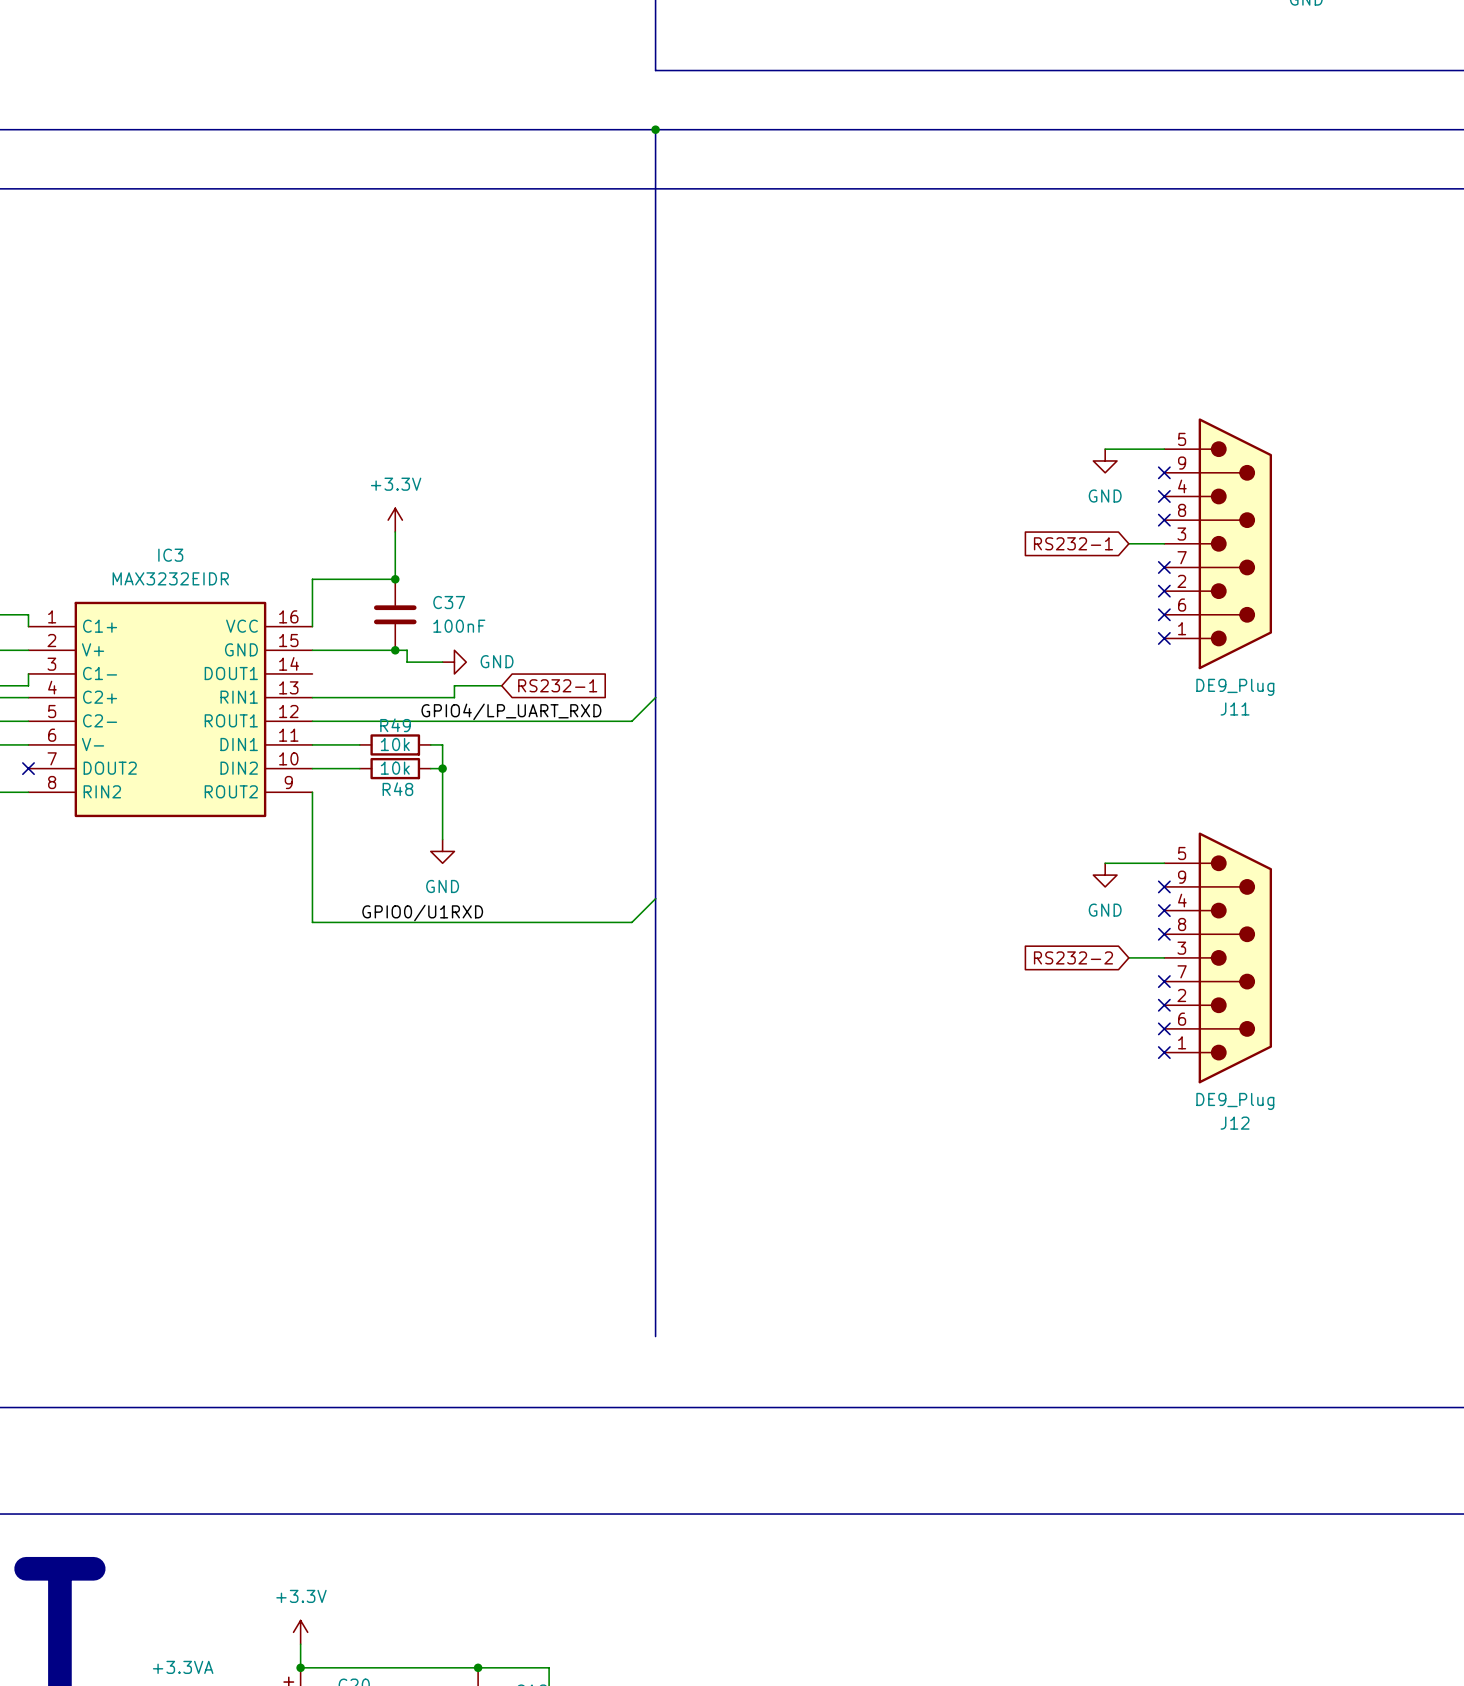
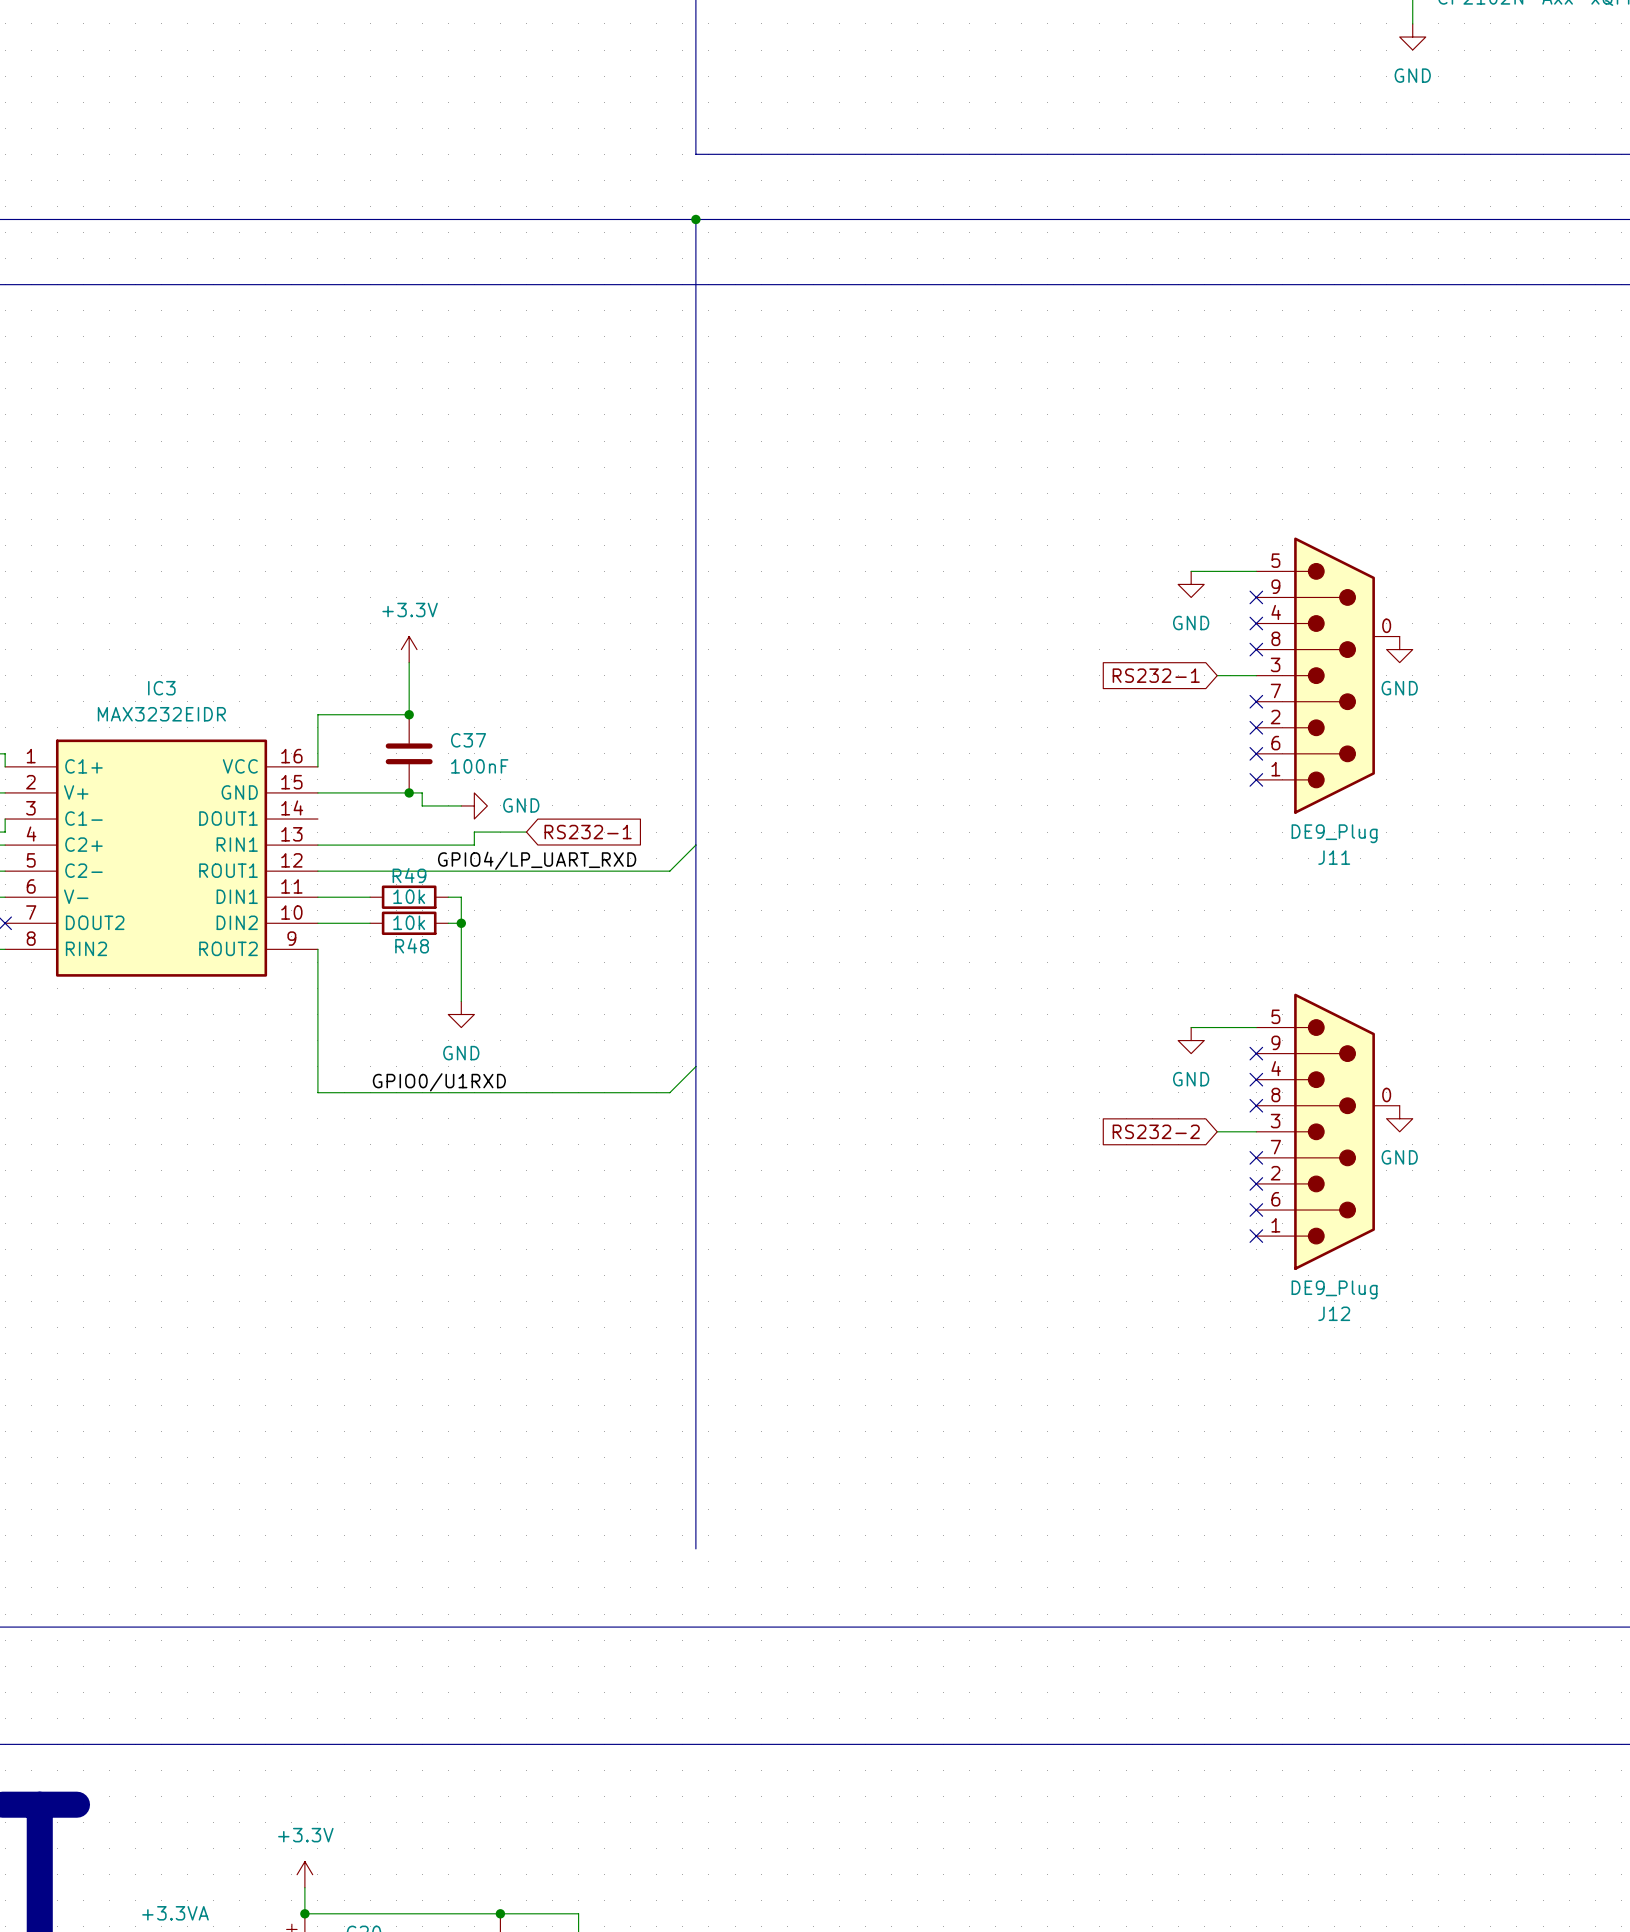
J11 symbol: [1164, 418, 1273, 670] -> [1256, 537, 1400, 814]
power symbol: none -> GND (1399, 649)
J12 symbol: [1164, 832, 1273, 1084] -> [1256, 993, 1400, 1270]
power symbol: none -> GND (1399, 1118)

